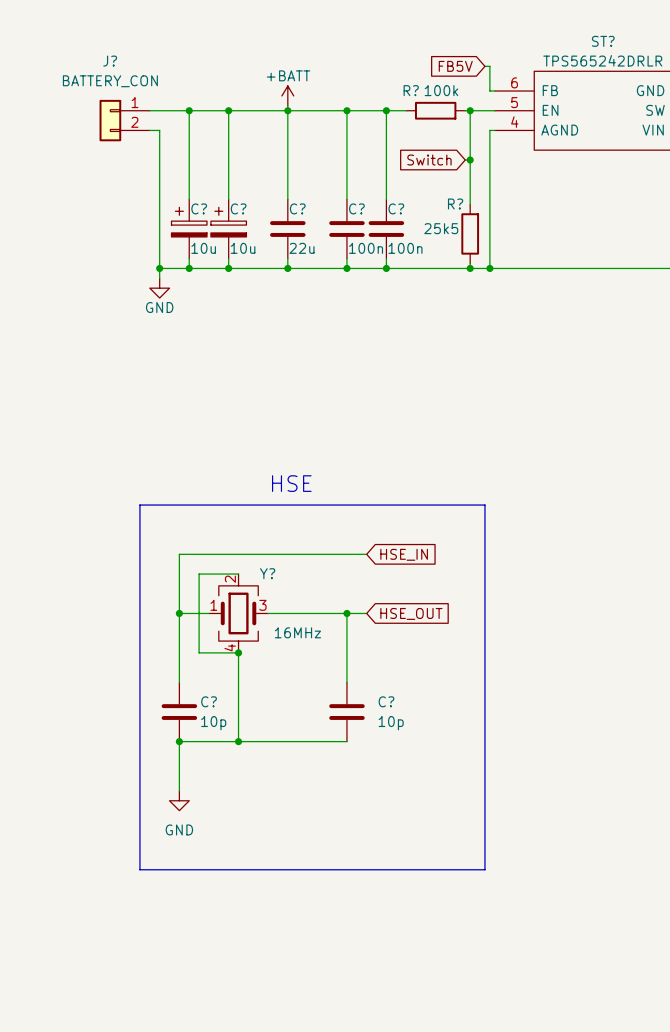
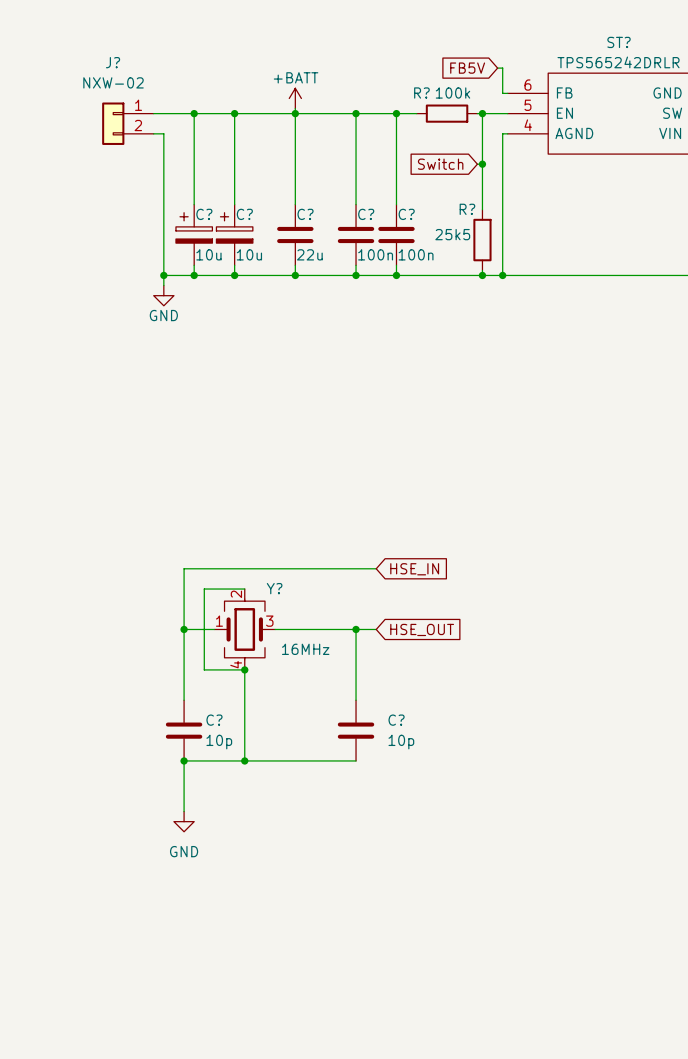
J? value: BATTERY_CON (110, 81) -> NXW-02 (113, 82)
text: HSE (291, 483) -> none
line: (139, 505) (139, 869) (484, 869) (484, 505) (139, 505) -> none

